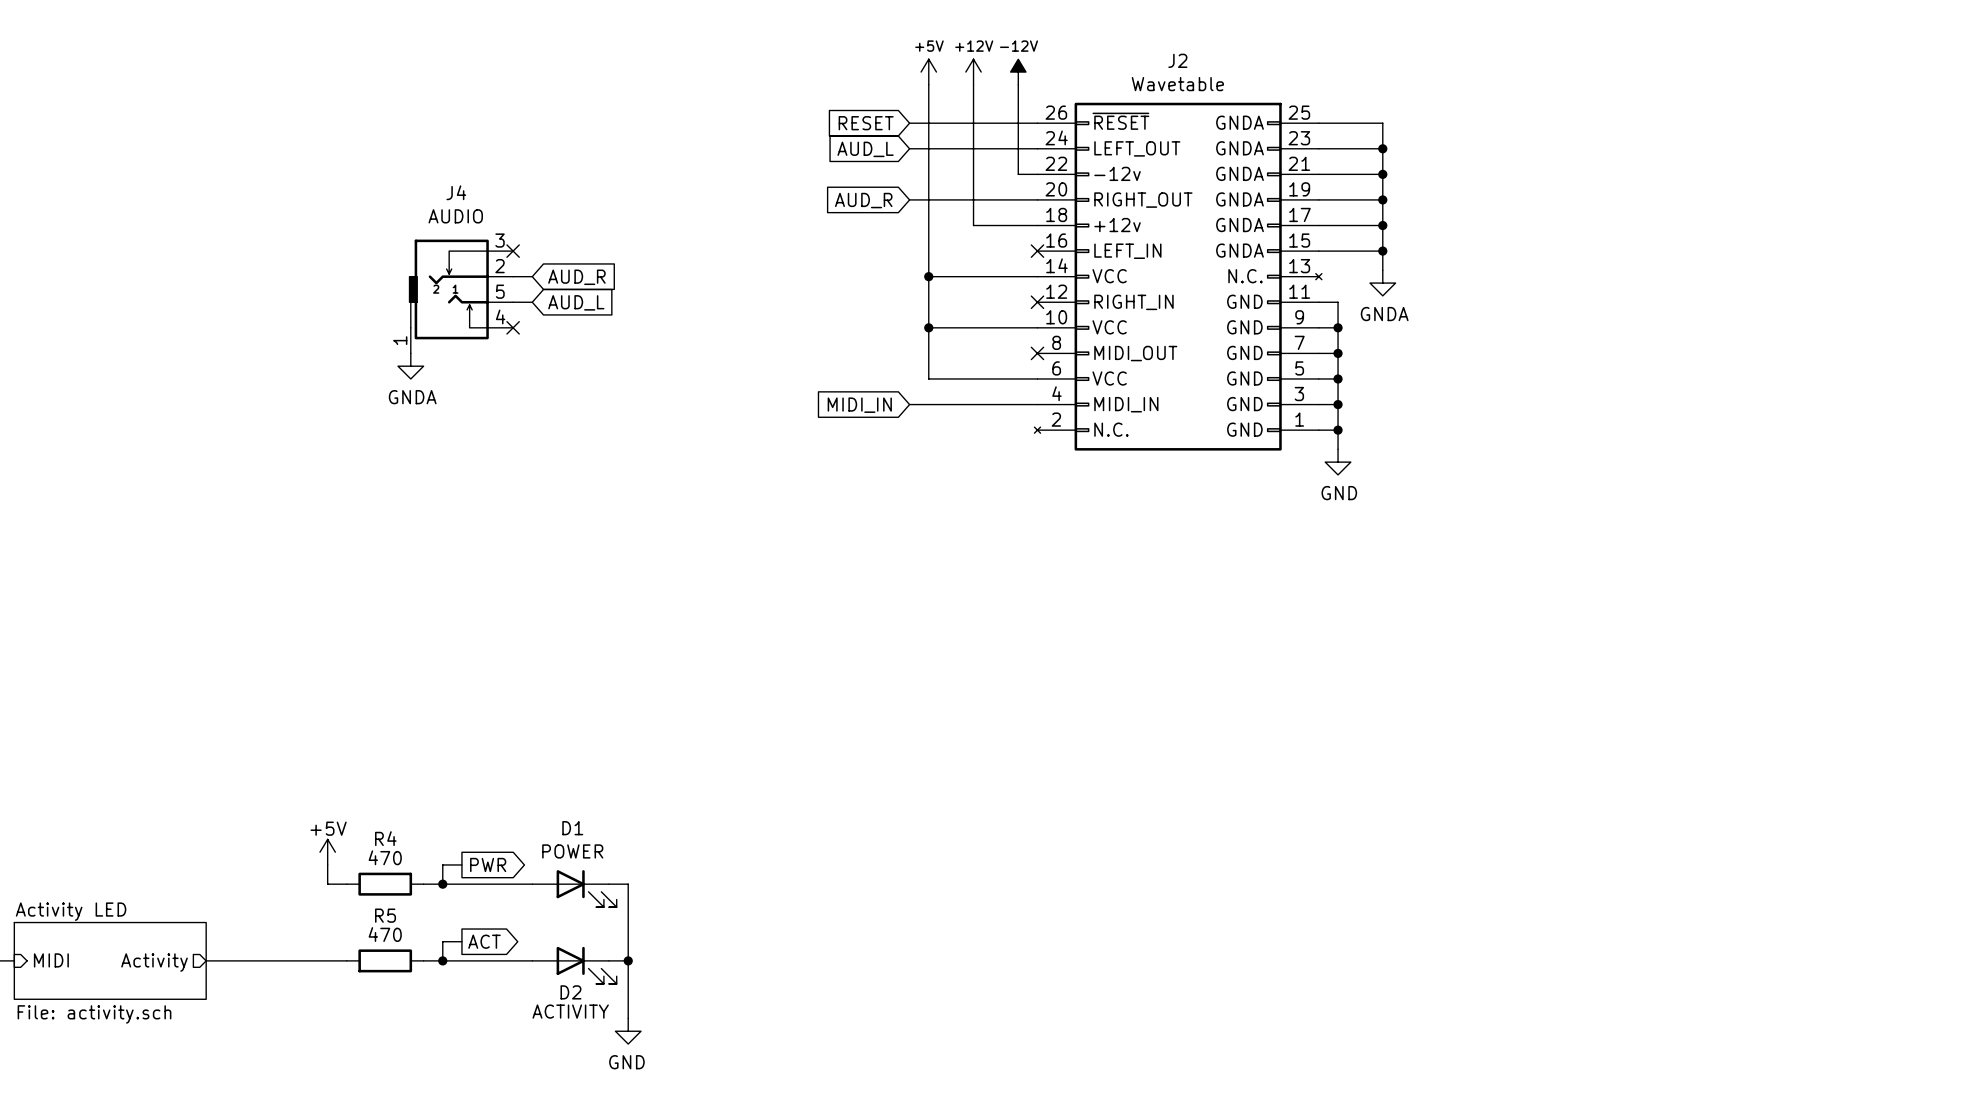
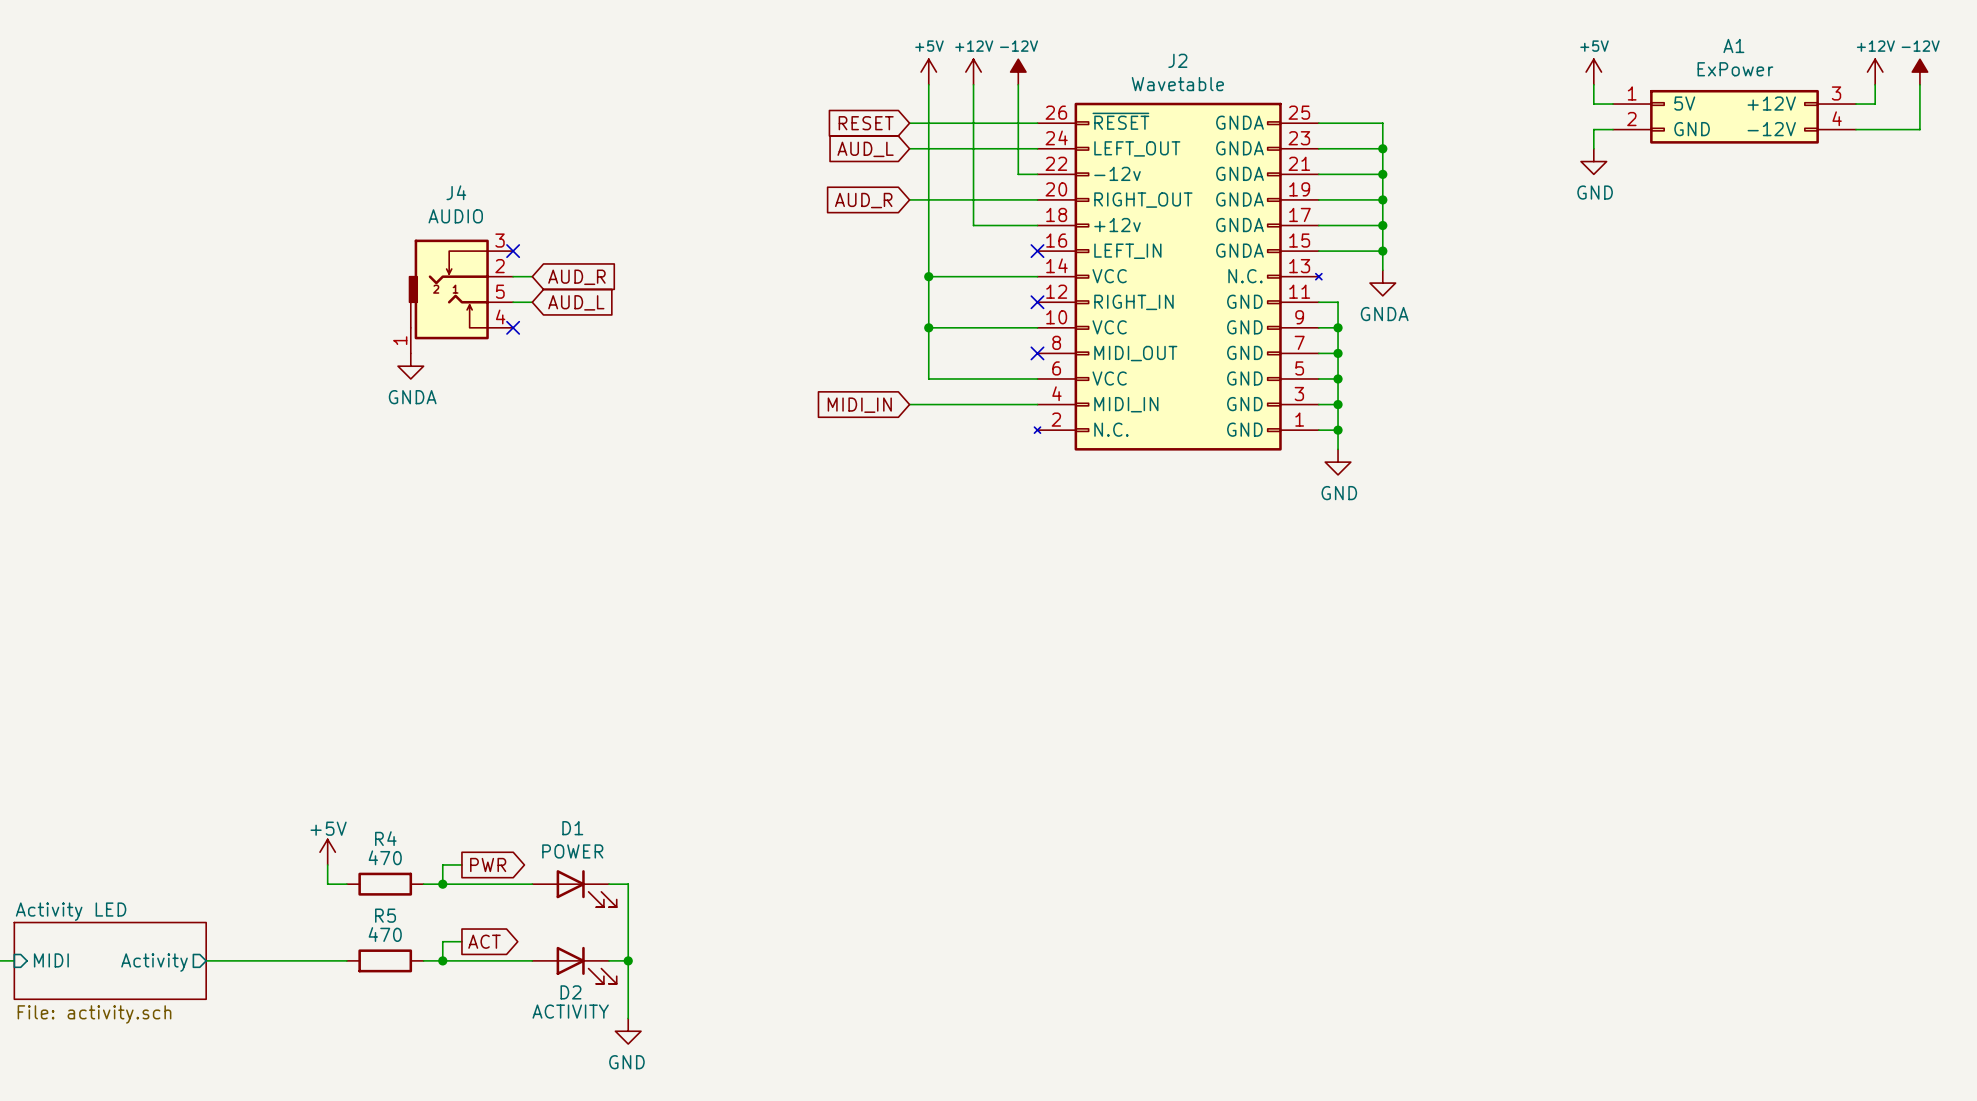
power symbol: none -> +5V (1593, 72)
power symbol: none -> +12V (1875, 72)
power symbol: none -> -12V (1919, 72)
wire: none -> (1593, 84) (1593, 104) (1613, 104)
wire: none -> (1875, 84) (1875, 104) (1855, 104)
wire: none -> (1919, 84) (1919, 129) (1855, 129)
A1: none -> ExPower (1734, 116)
wire: none -> (1613, 129) (1593, 129) (1593, 148)
power symbol: none -> GND (1593, 161)

